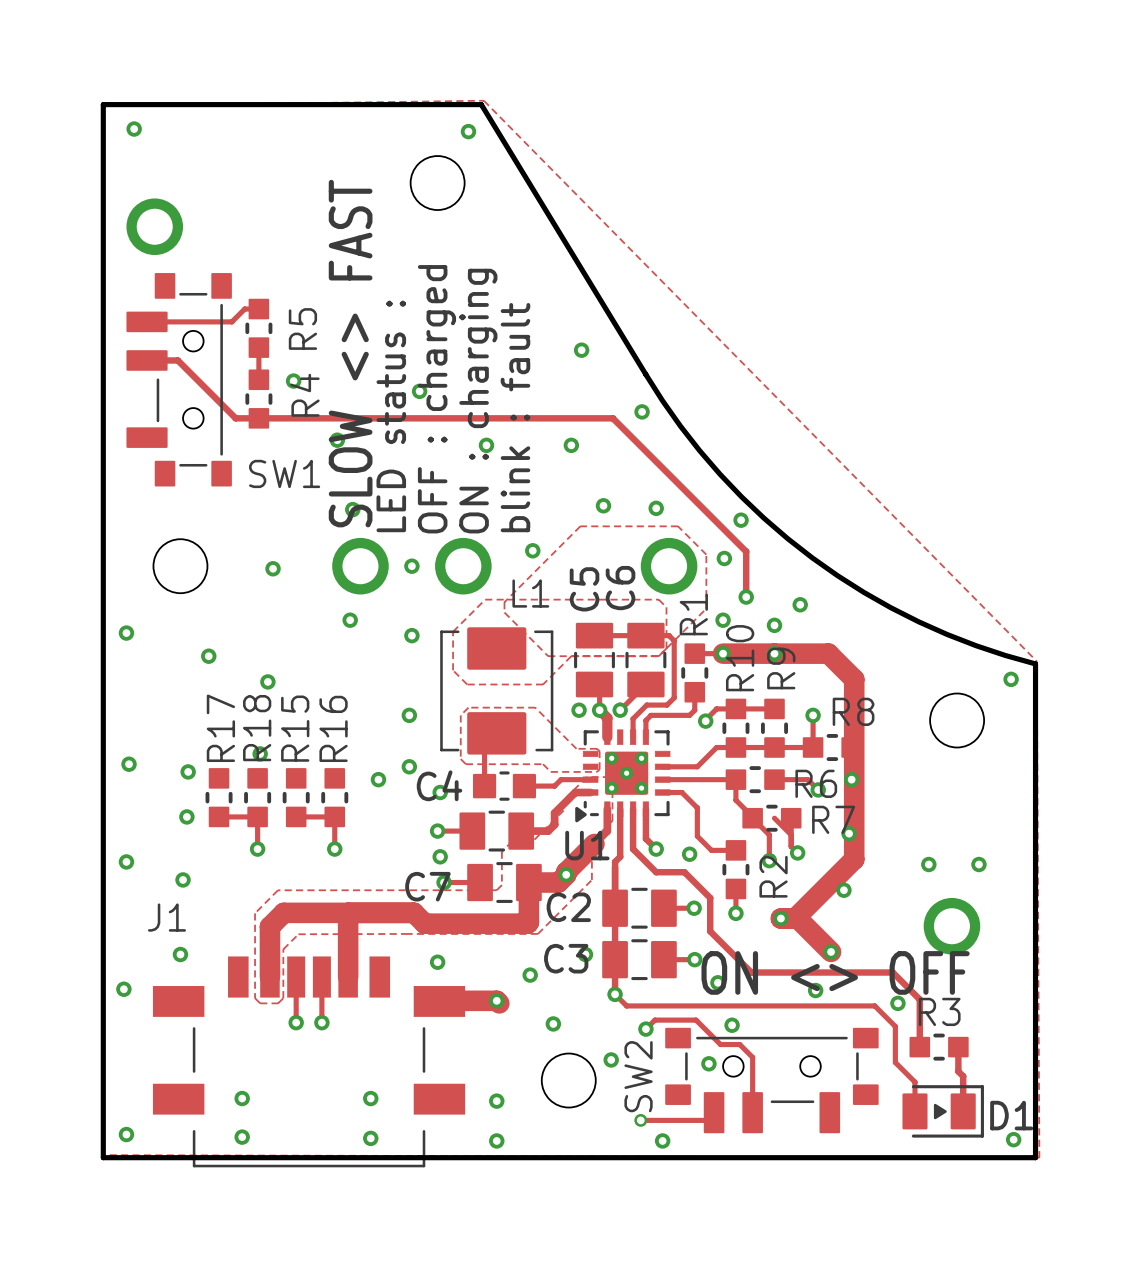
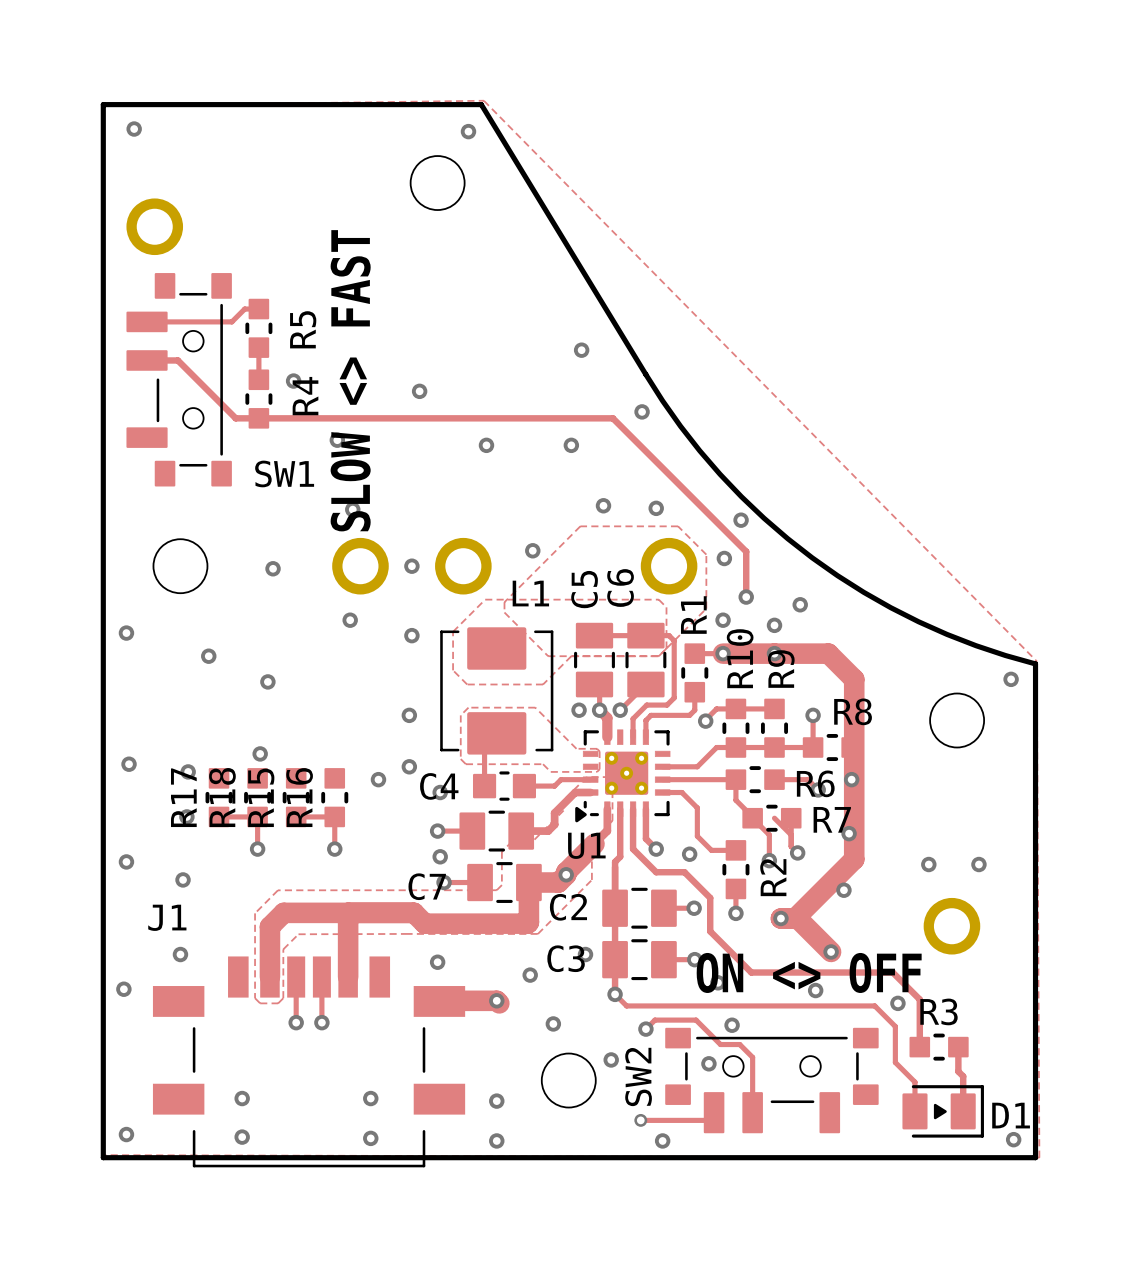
text: OFF : charged (436, 399) -> none
text: ON : charging (478, 401) -> none
text: LED status : (391, 416) -> none
text: blink : fault (515, 417) -> none
R17 name position: R17 (220, 728) -> R17 (183, 797)
R18 name position: R18 (257, 728) -> R18 (222, 797)
R15 name position: R15 (295, 728) -> R15 (261, 797)
R16 name position: R16 (333, 728) -> R16 (299, 797)

